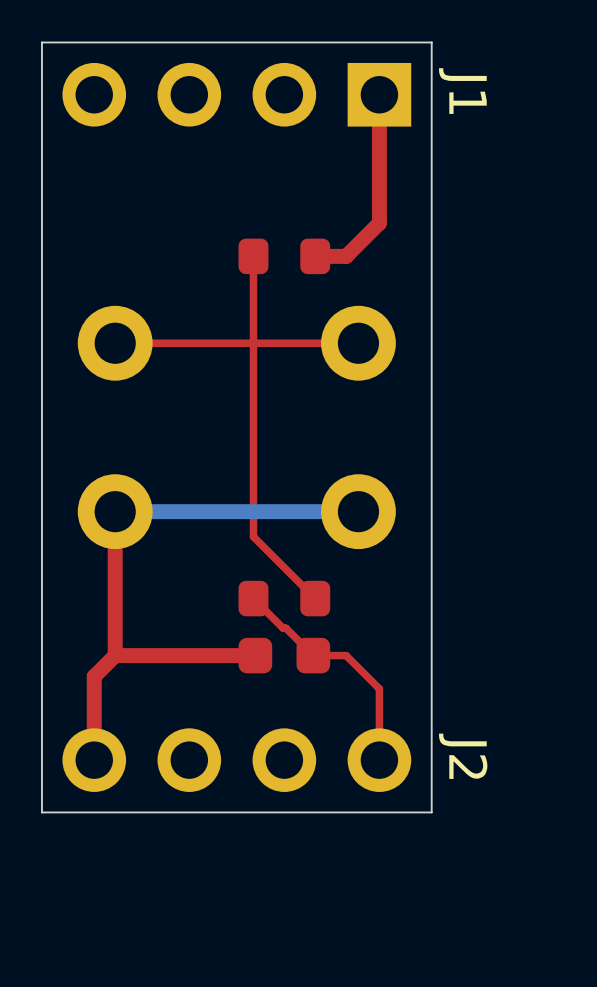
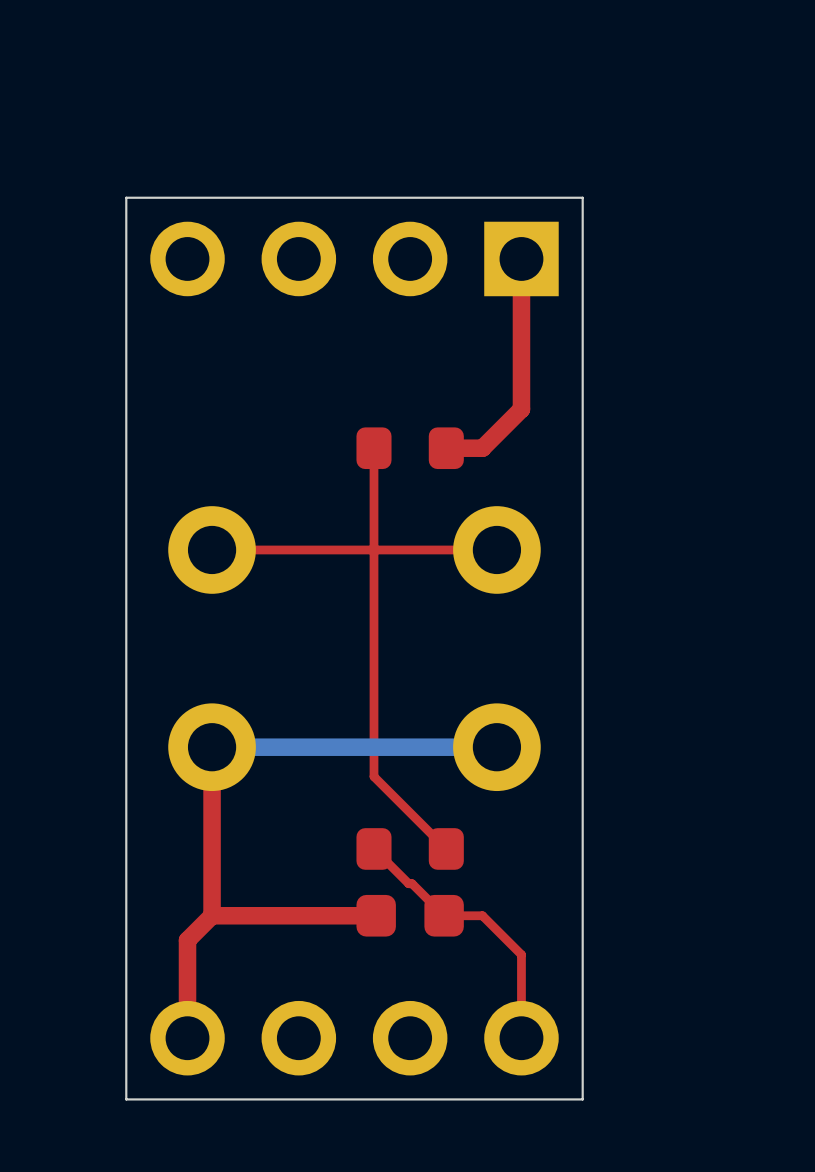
J1 name: J1 (462, 91) -> none
J2 name: J2 (463, 756) -> none

